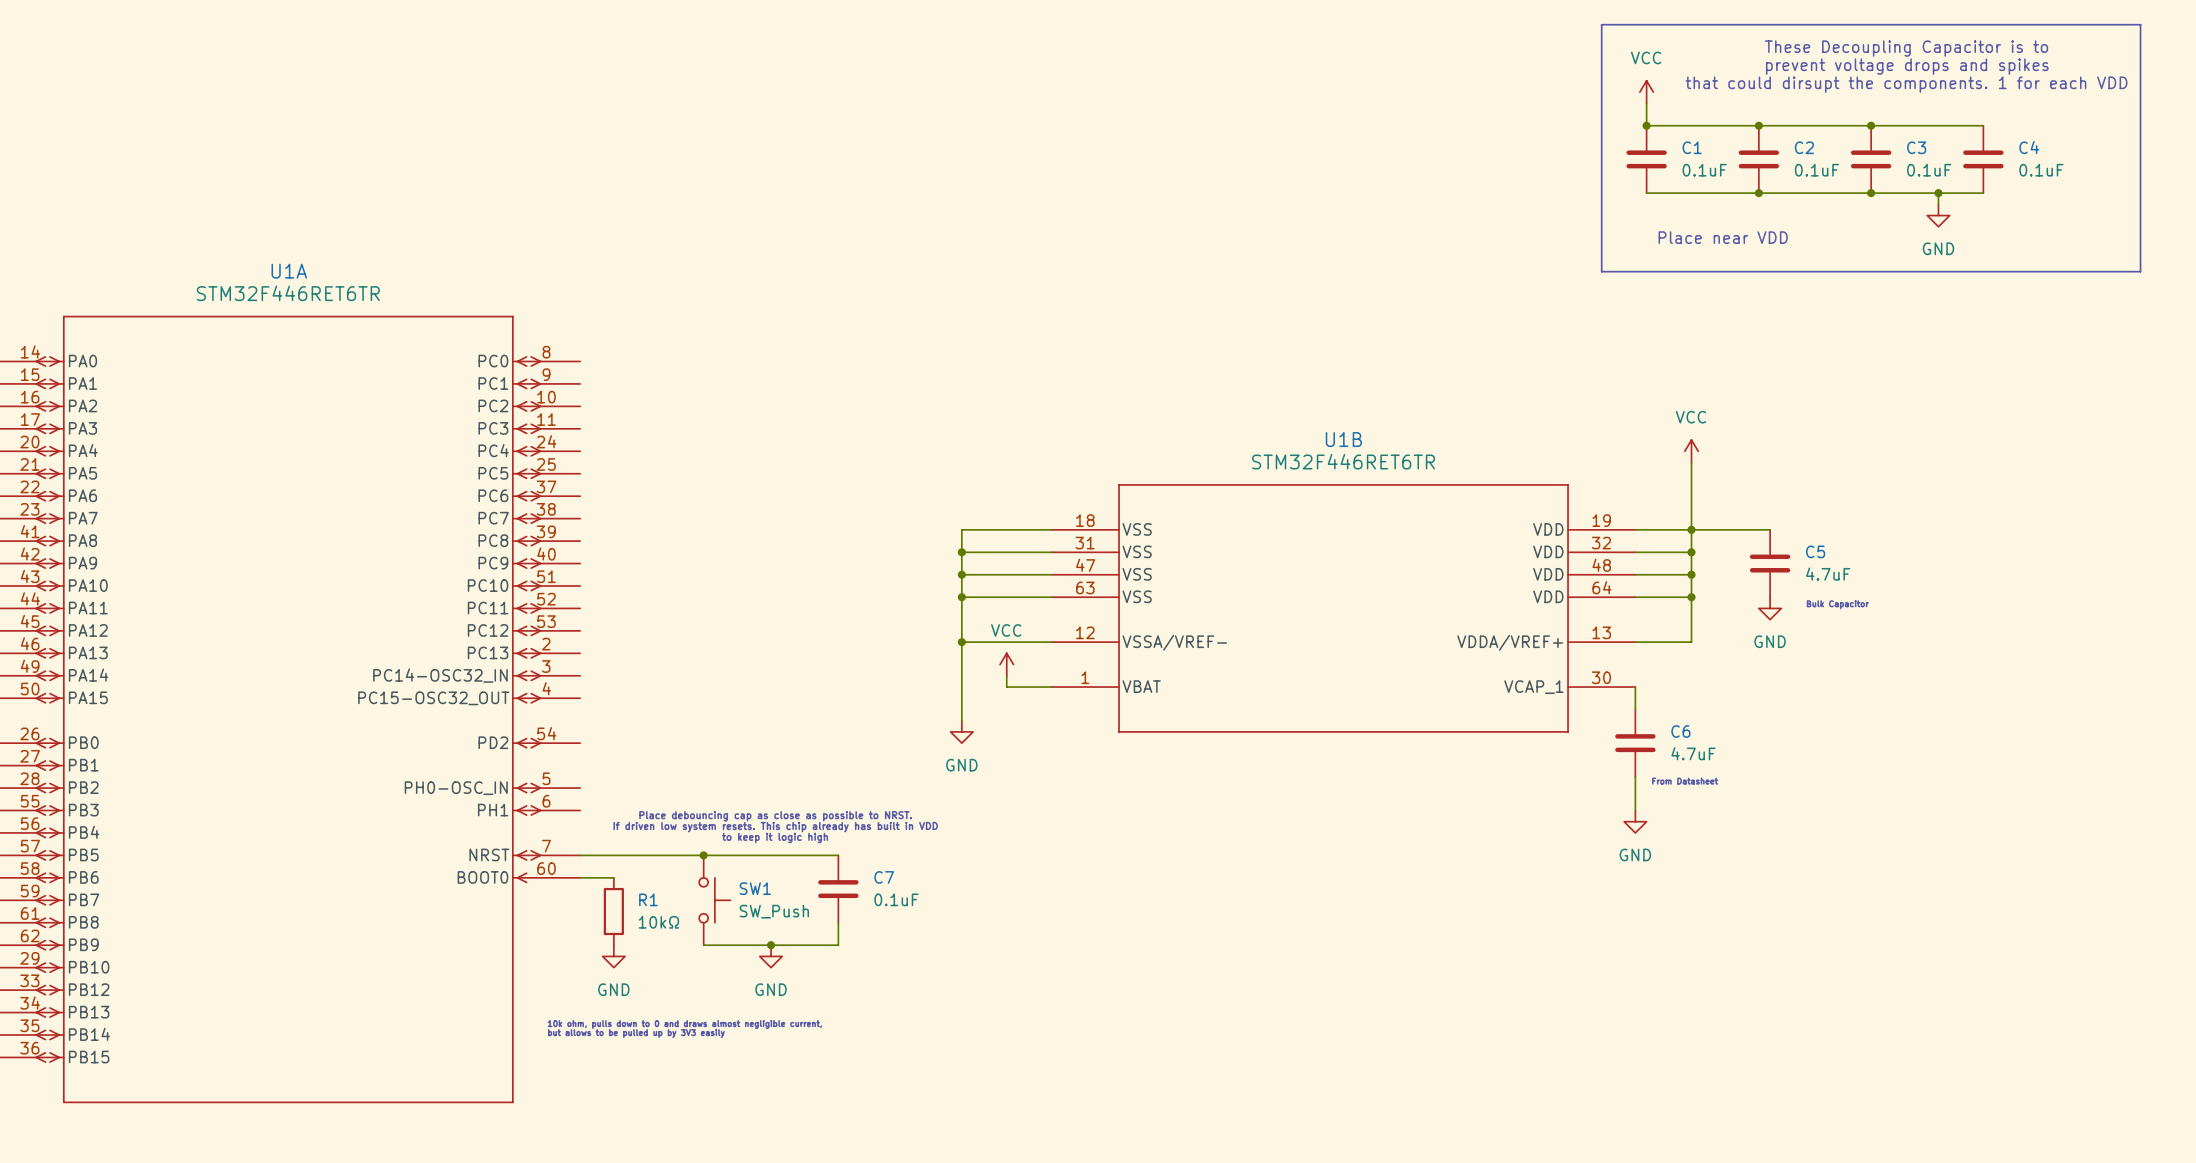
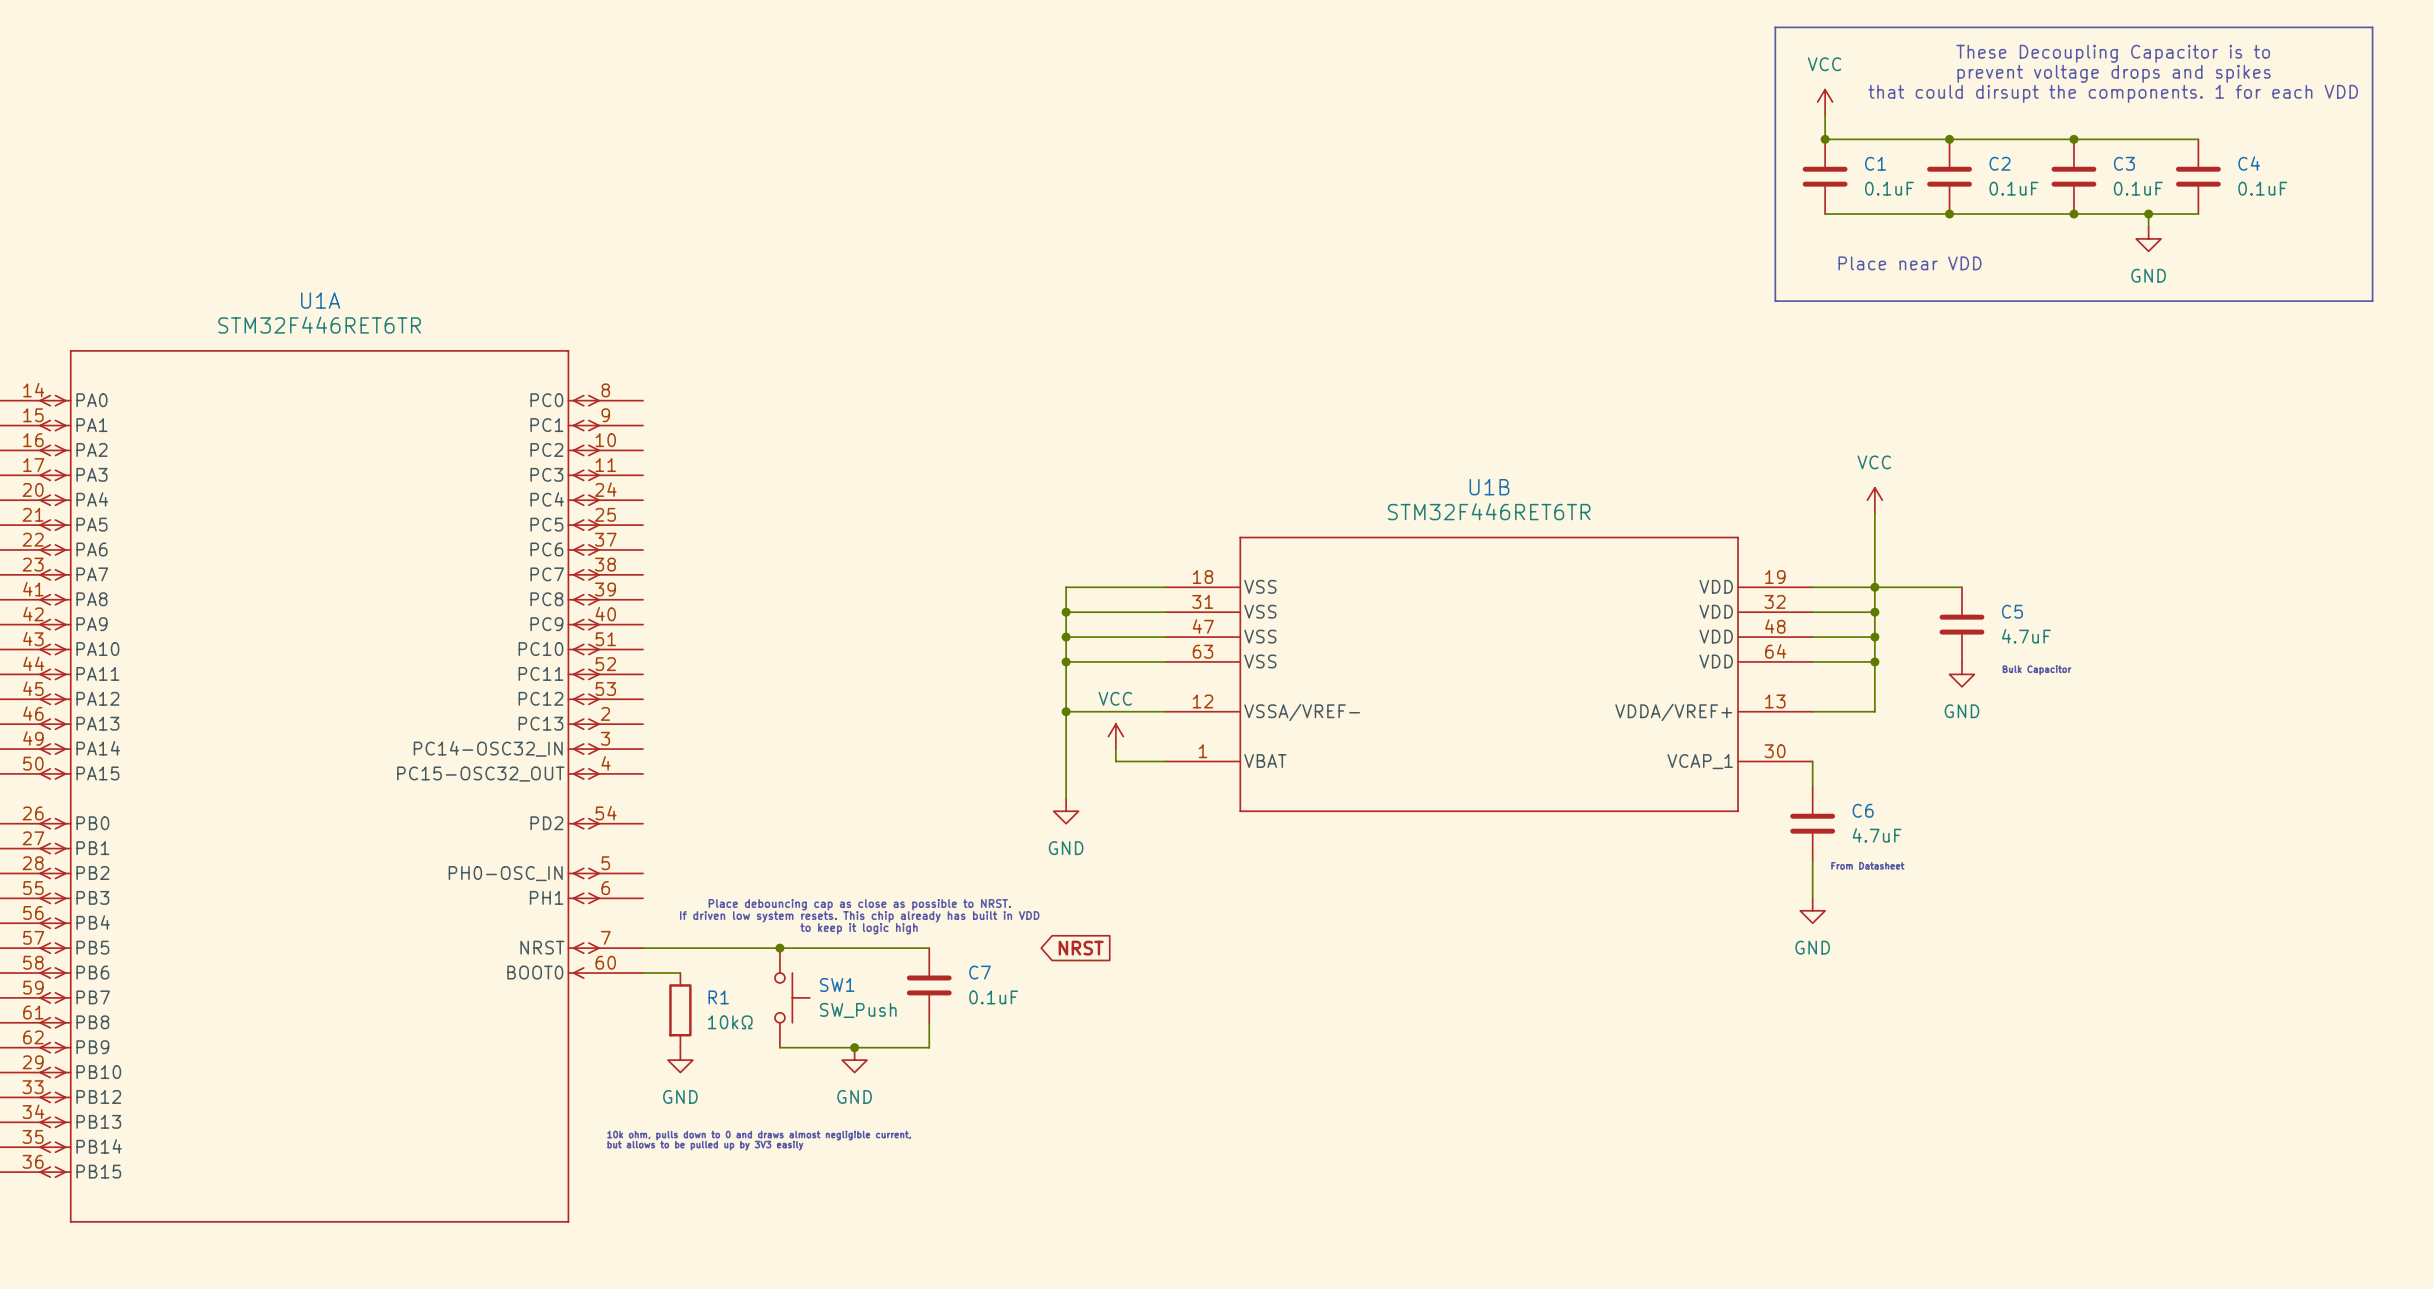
global label: none -> NRST (1081, 948)

